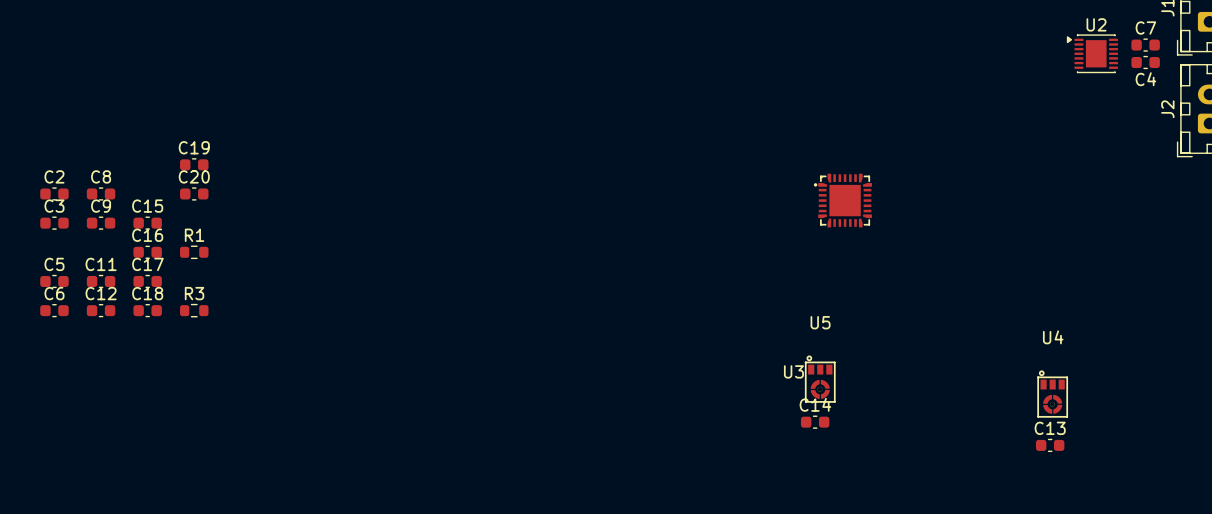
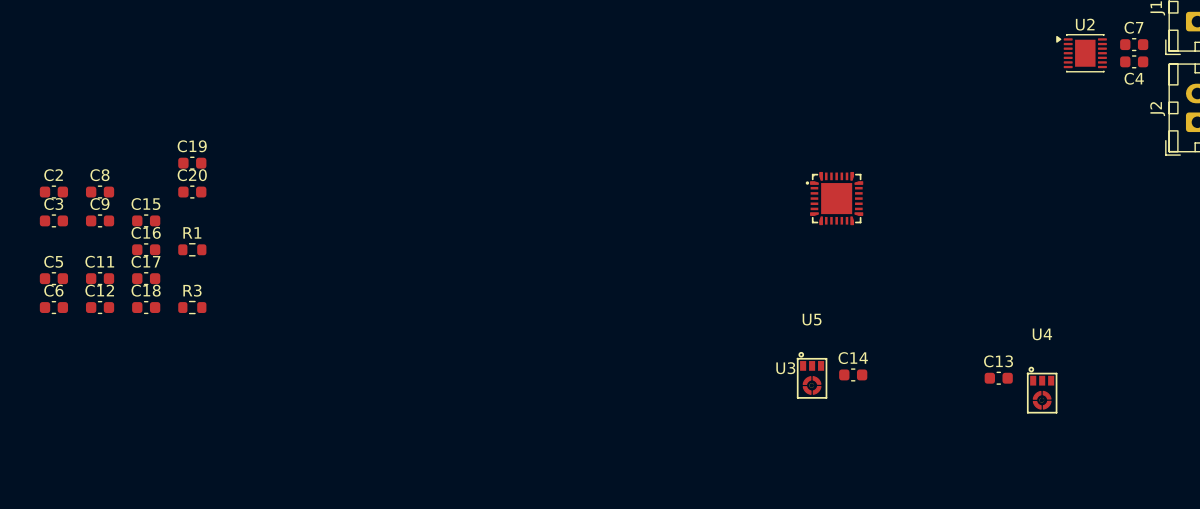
C14 position: (815, 422) -> (853, 374)
C13 position: (1050, 445) -> (998, 378)

